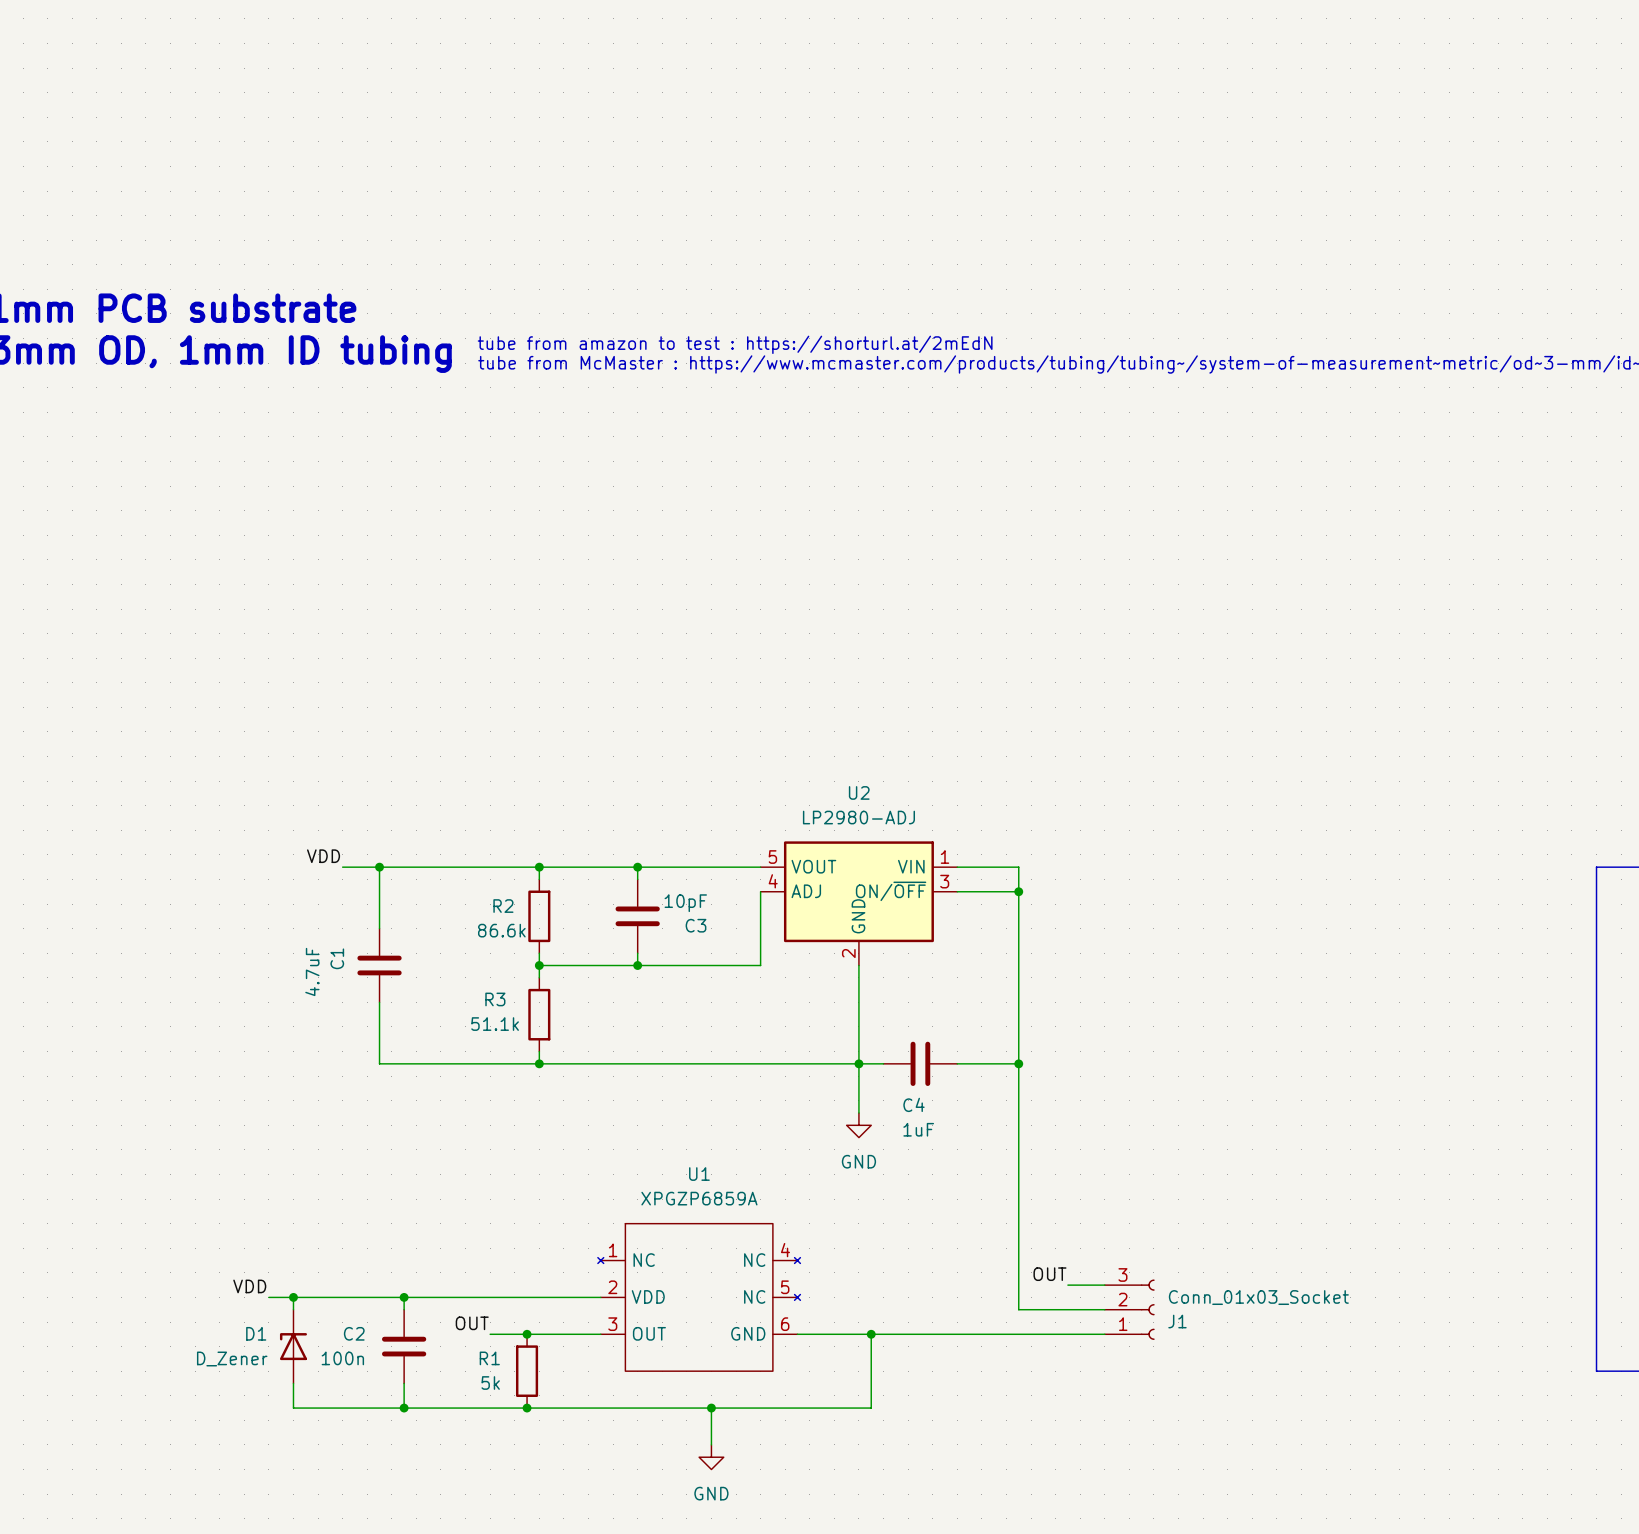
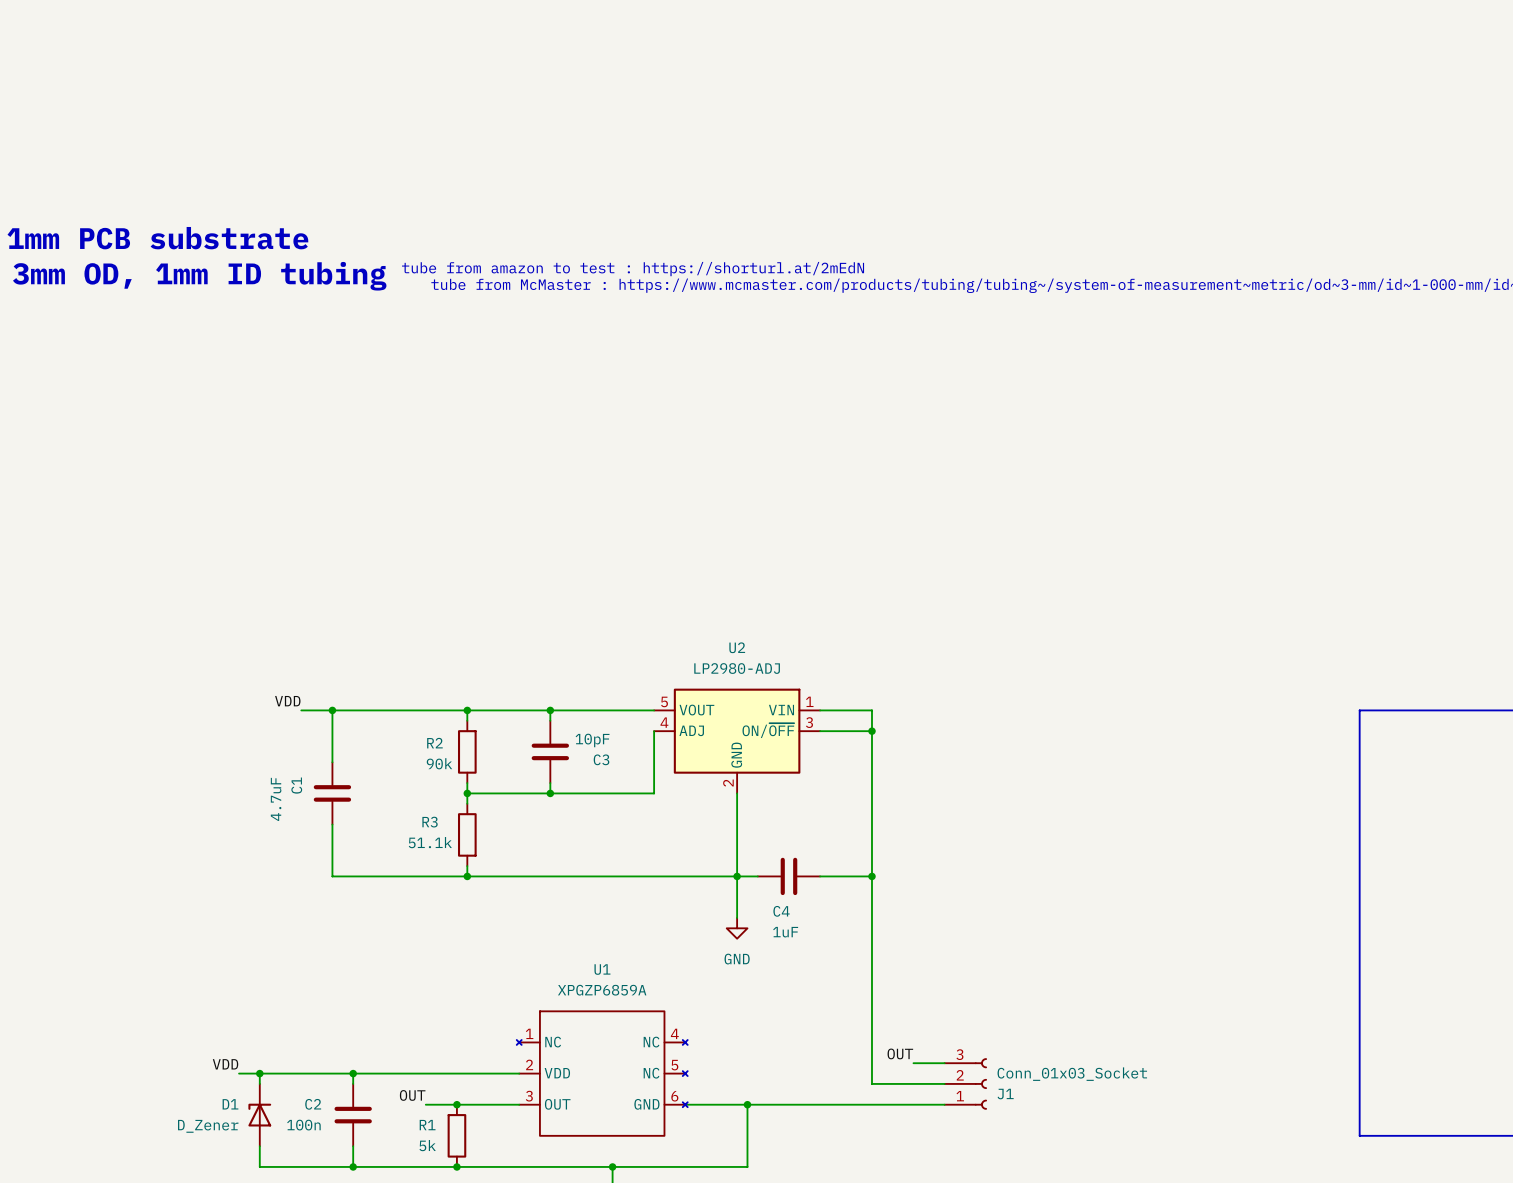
R2 value: 86.6k (501, 930) -> 90k (439, 763)
U1 symbol: [597, 1223, 801, 1372] -> [516, 1011, 688, 1136]

